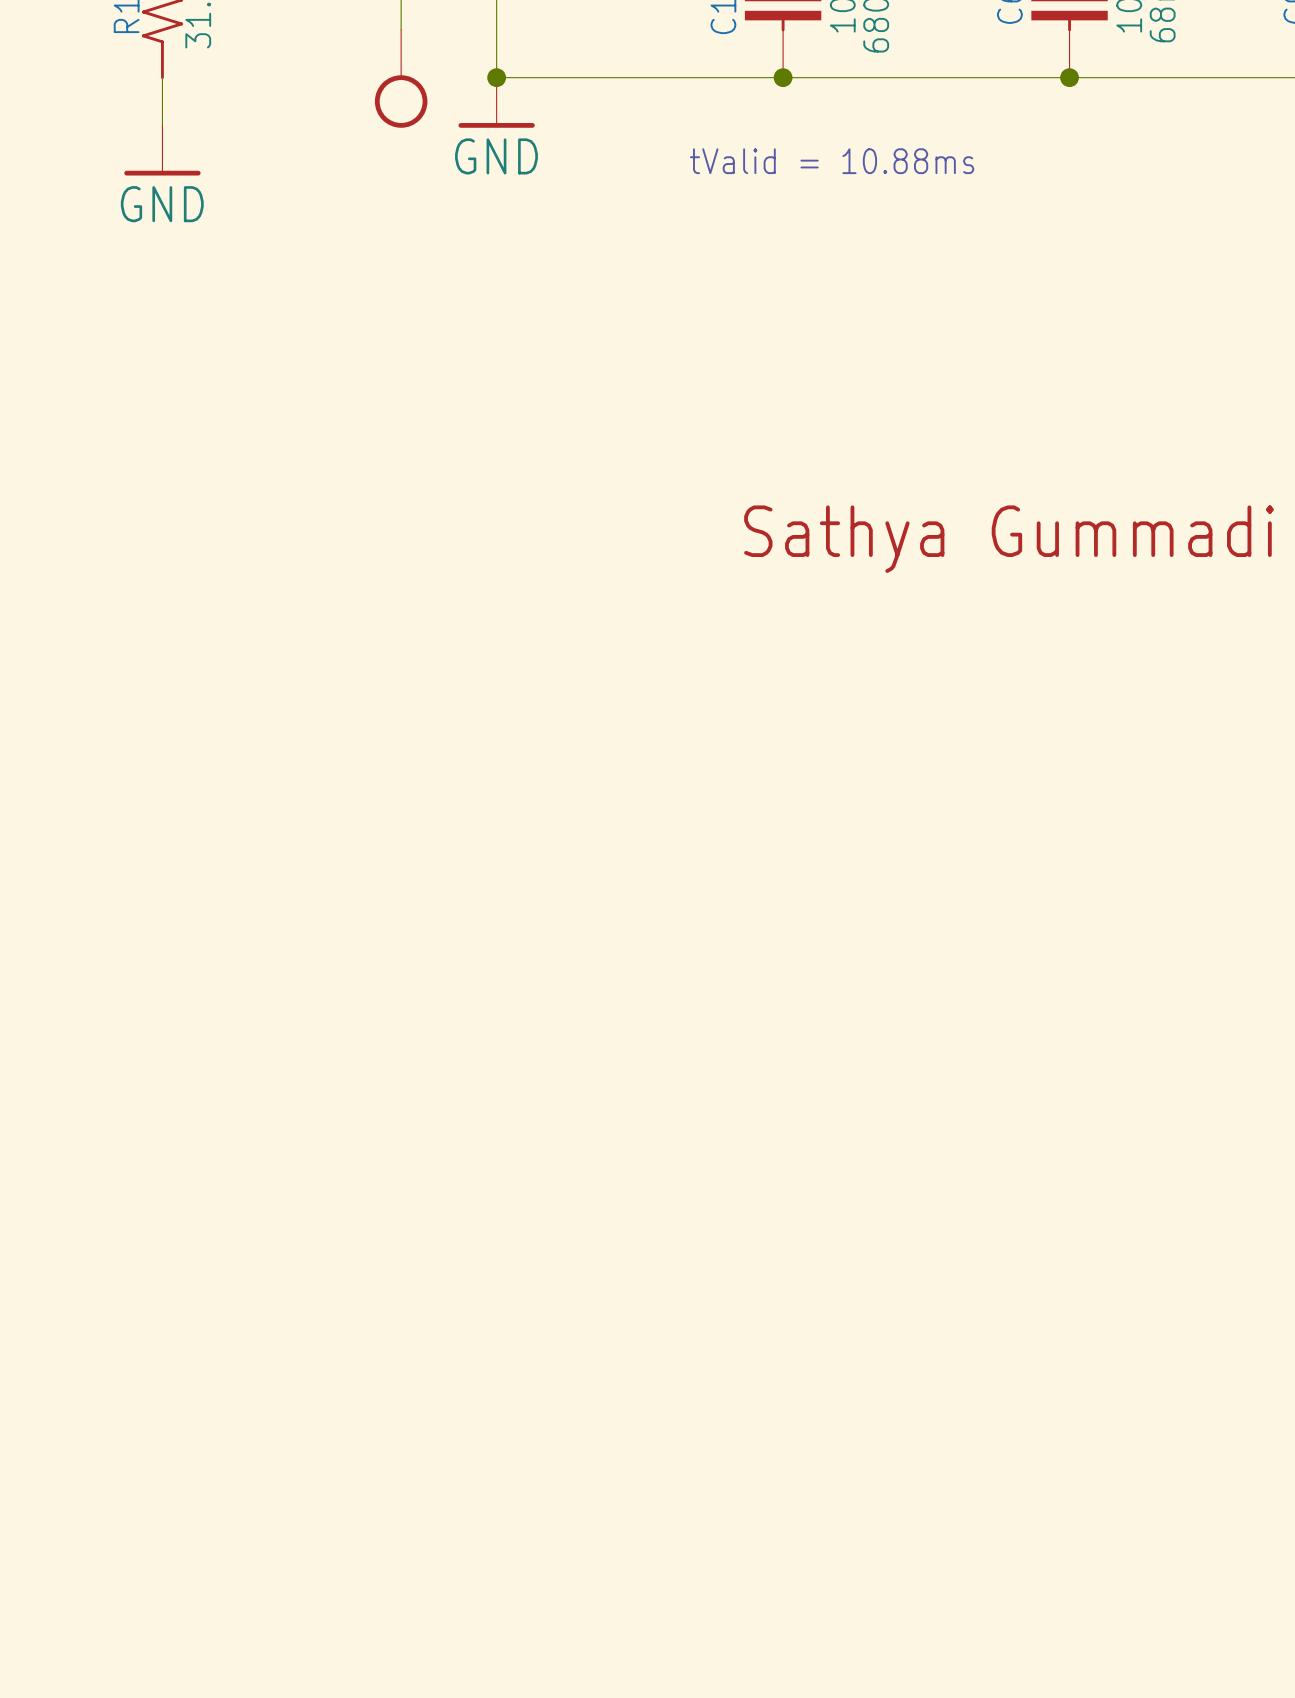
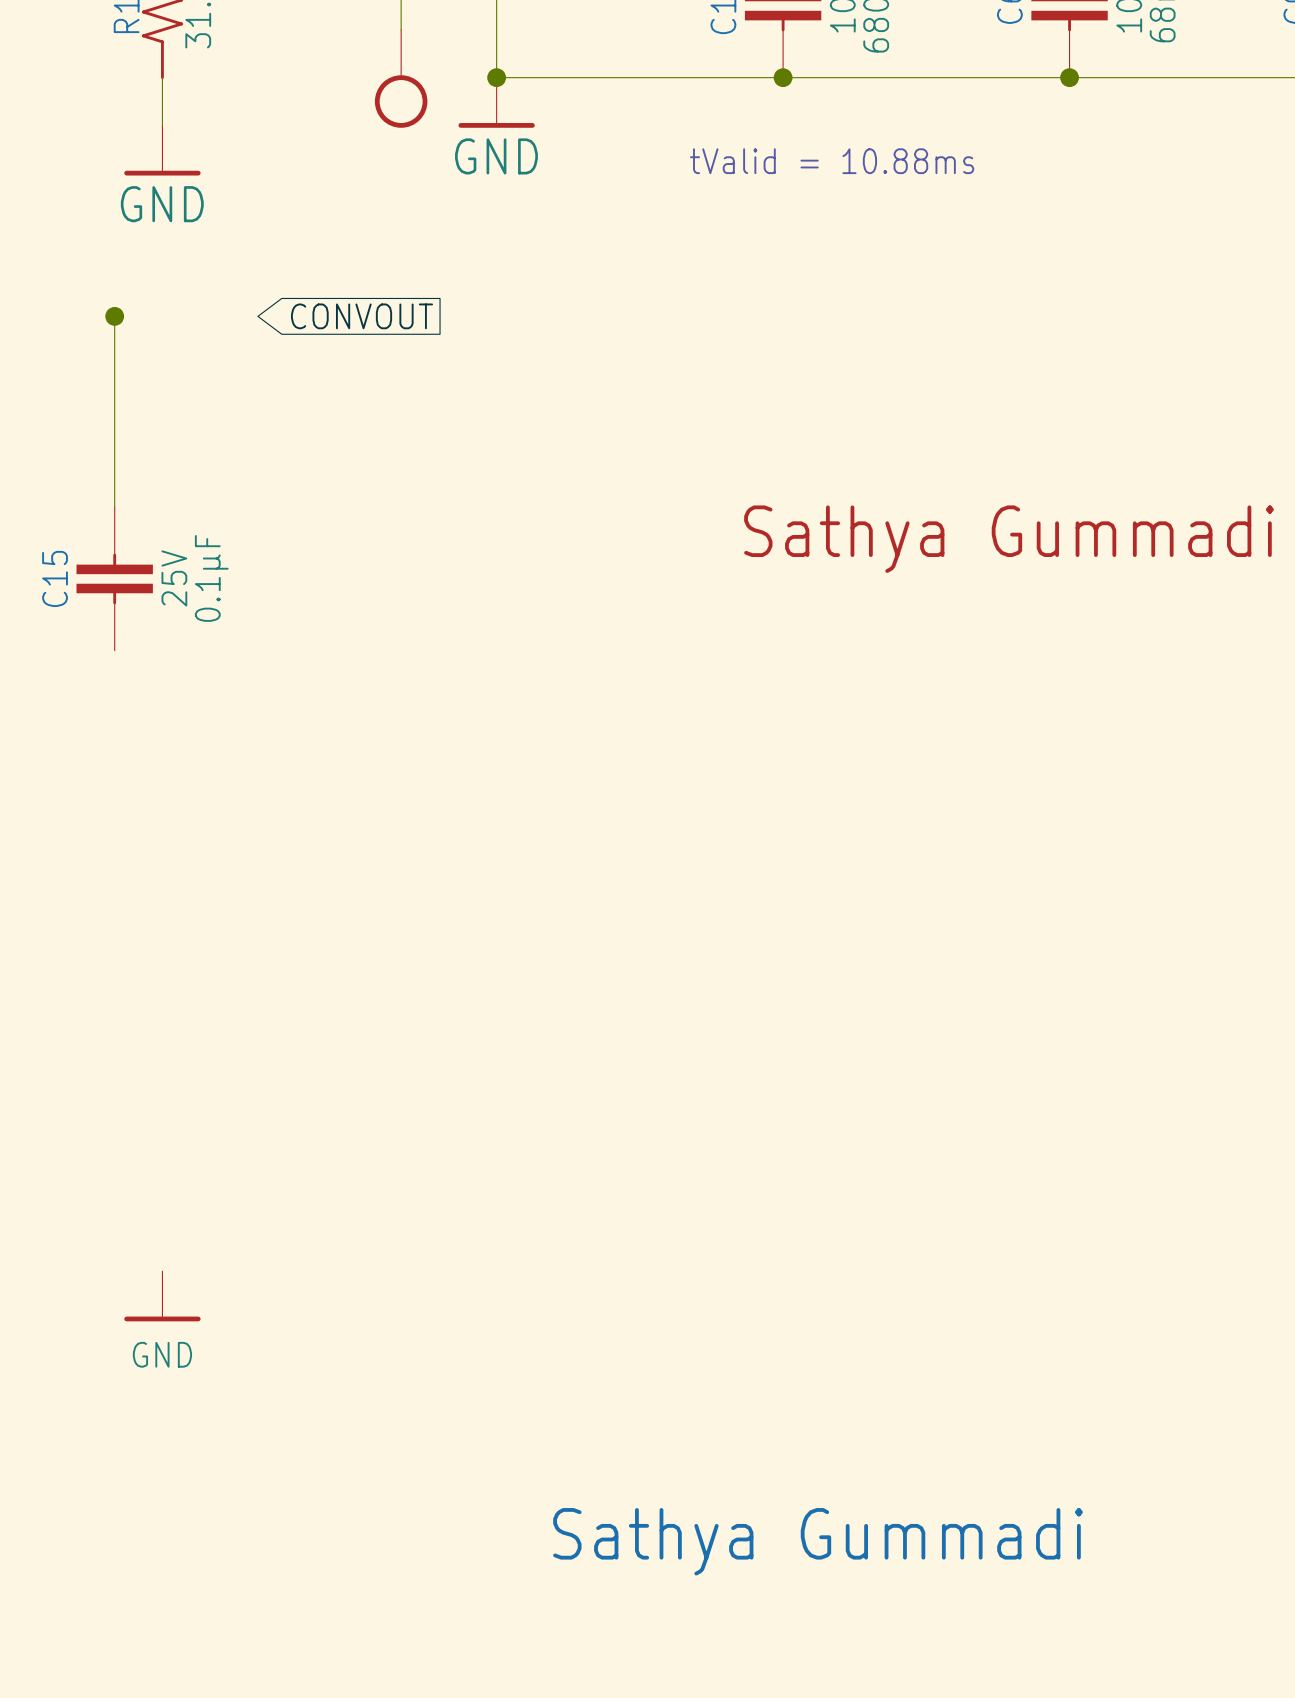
wire: none -> (114, 316) (114, 507)
junction: none -> (114, 316)
global label: none -> CONVOUT (362, 316)
C15: none -> (114, 578)
power symbol: none -> GND (162, 1296)
text: none -> Sathya Gummadi (818, 1541)

